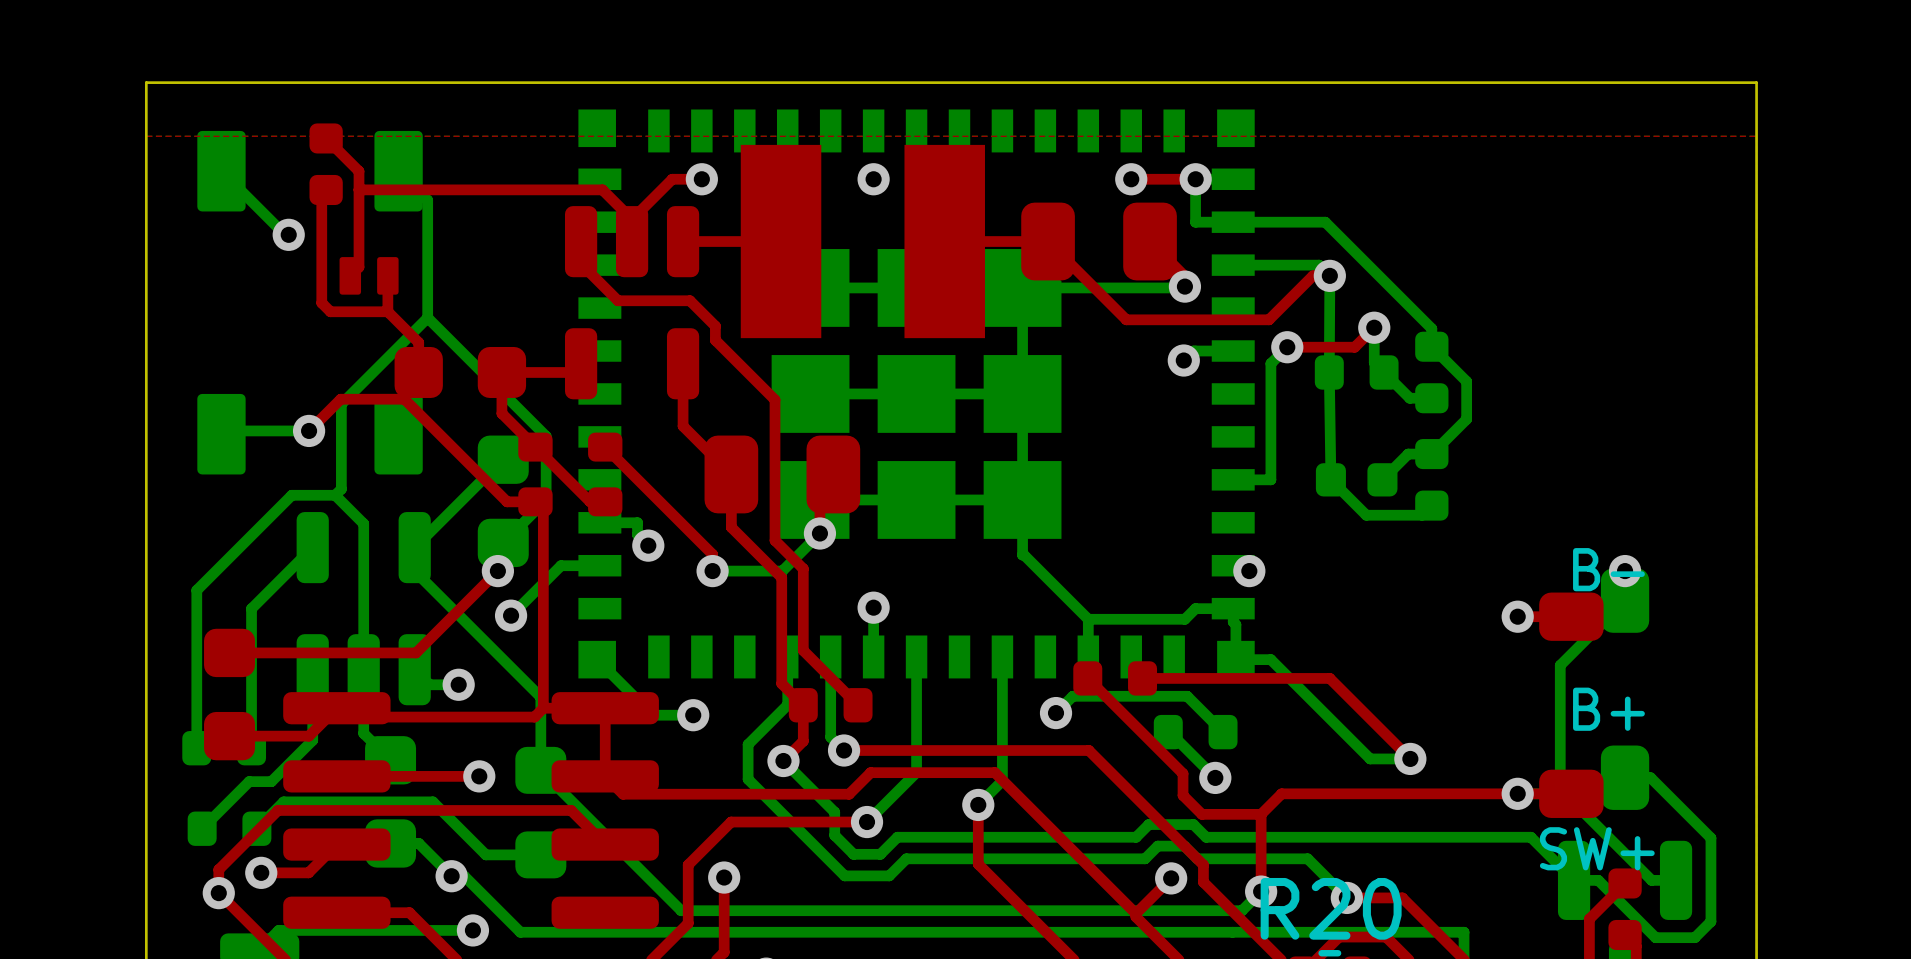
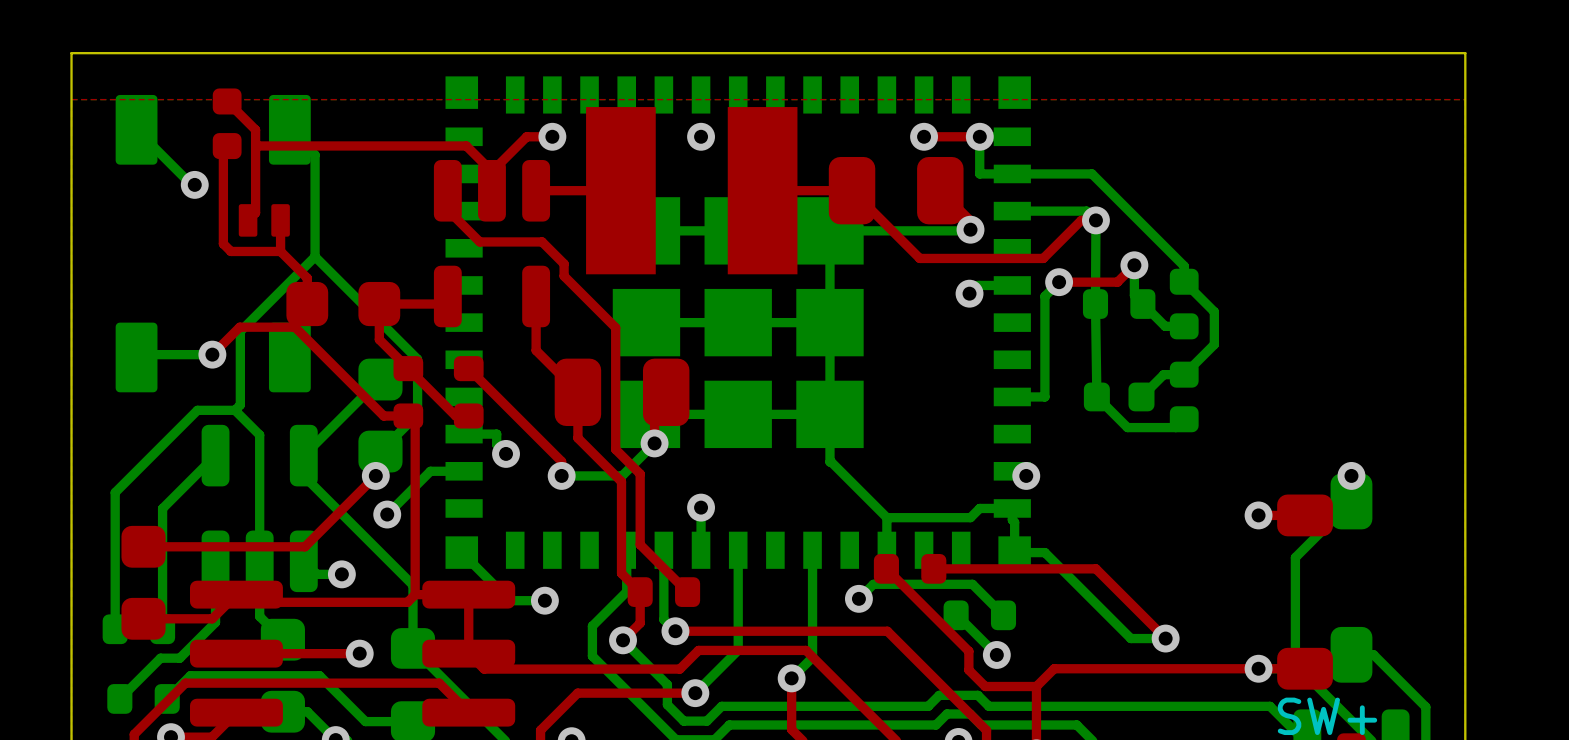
text: B- (1608, 569) -> none
text: B+ (1608, 709) -> none

